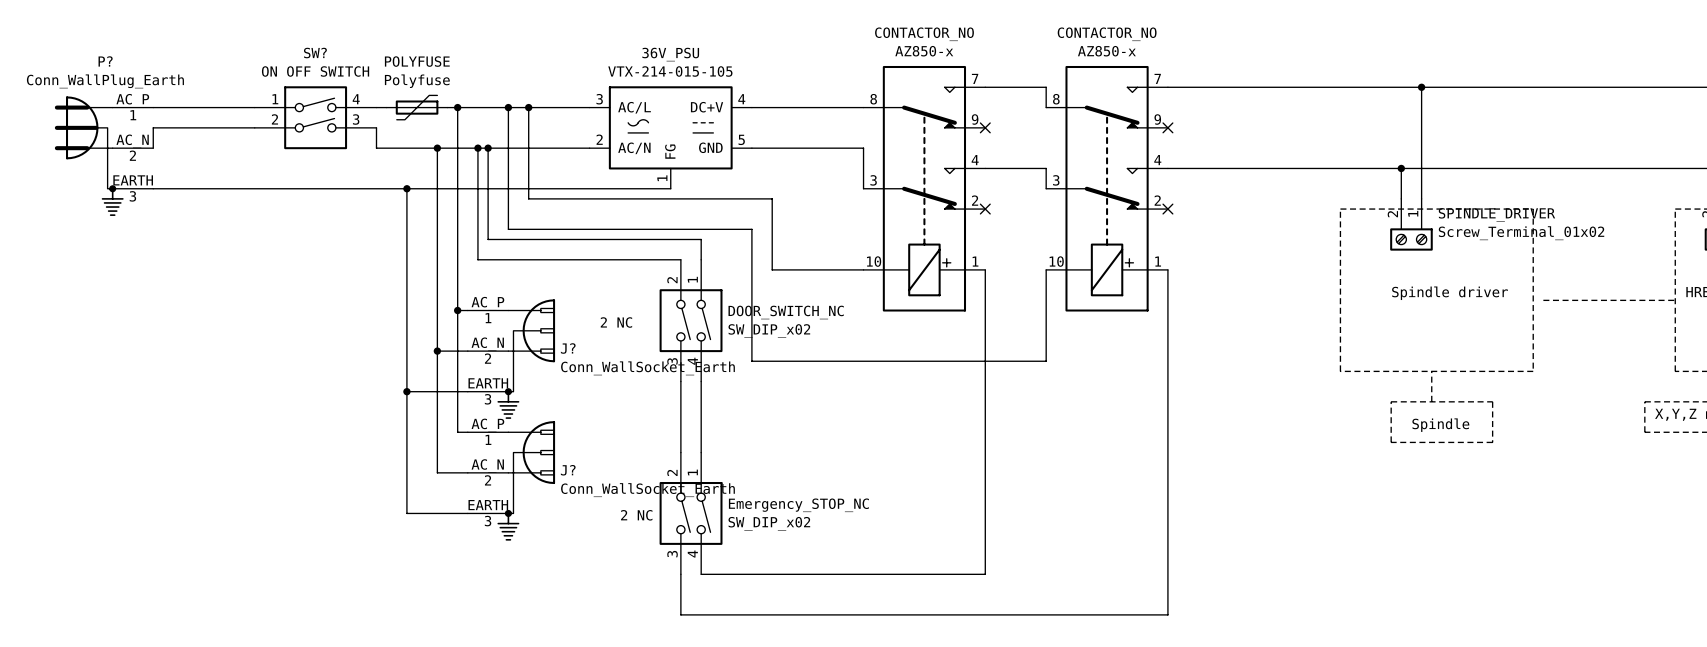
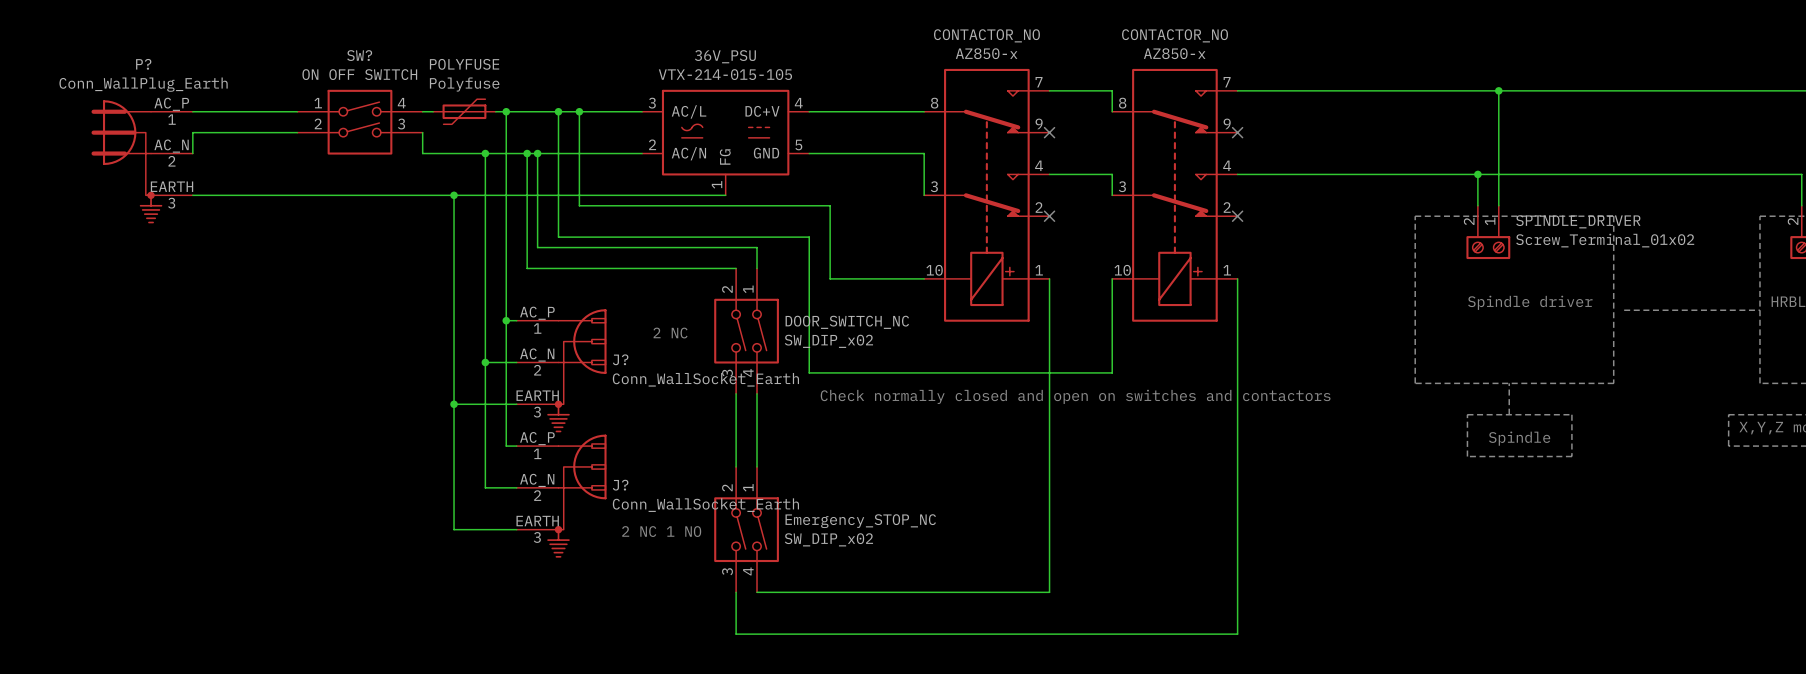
text: none -> Check normally closed and open on switches and contactors (1075, 396)
text: 2 NC (636, 515) -> 2 NC 1 NO (661, 531)

